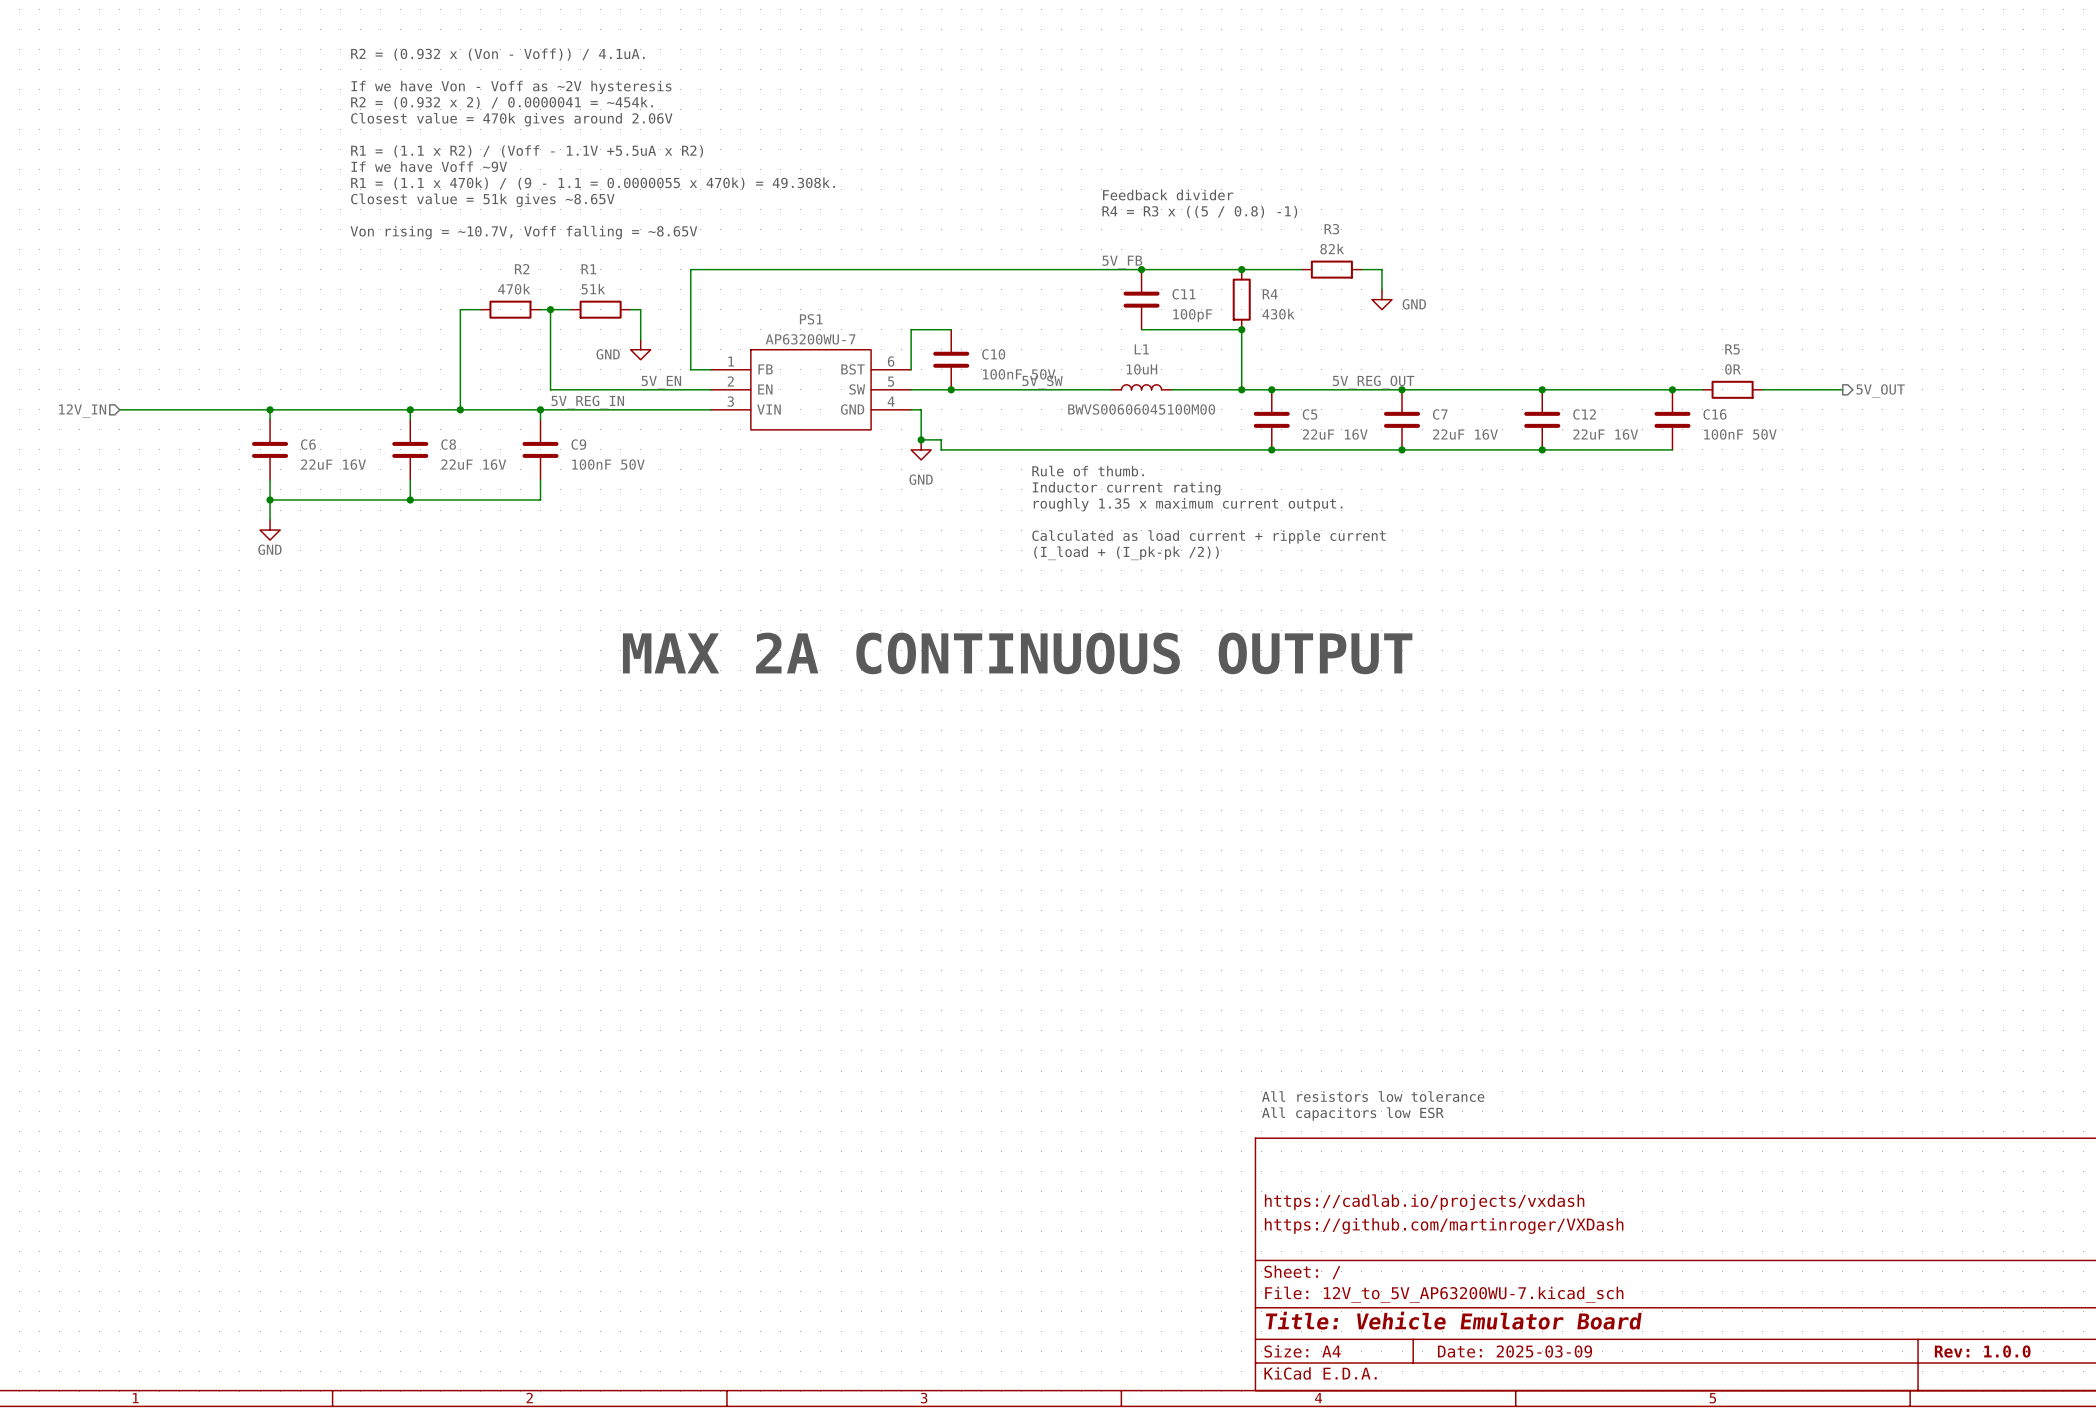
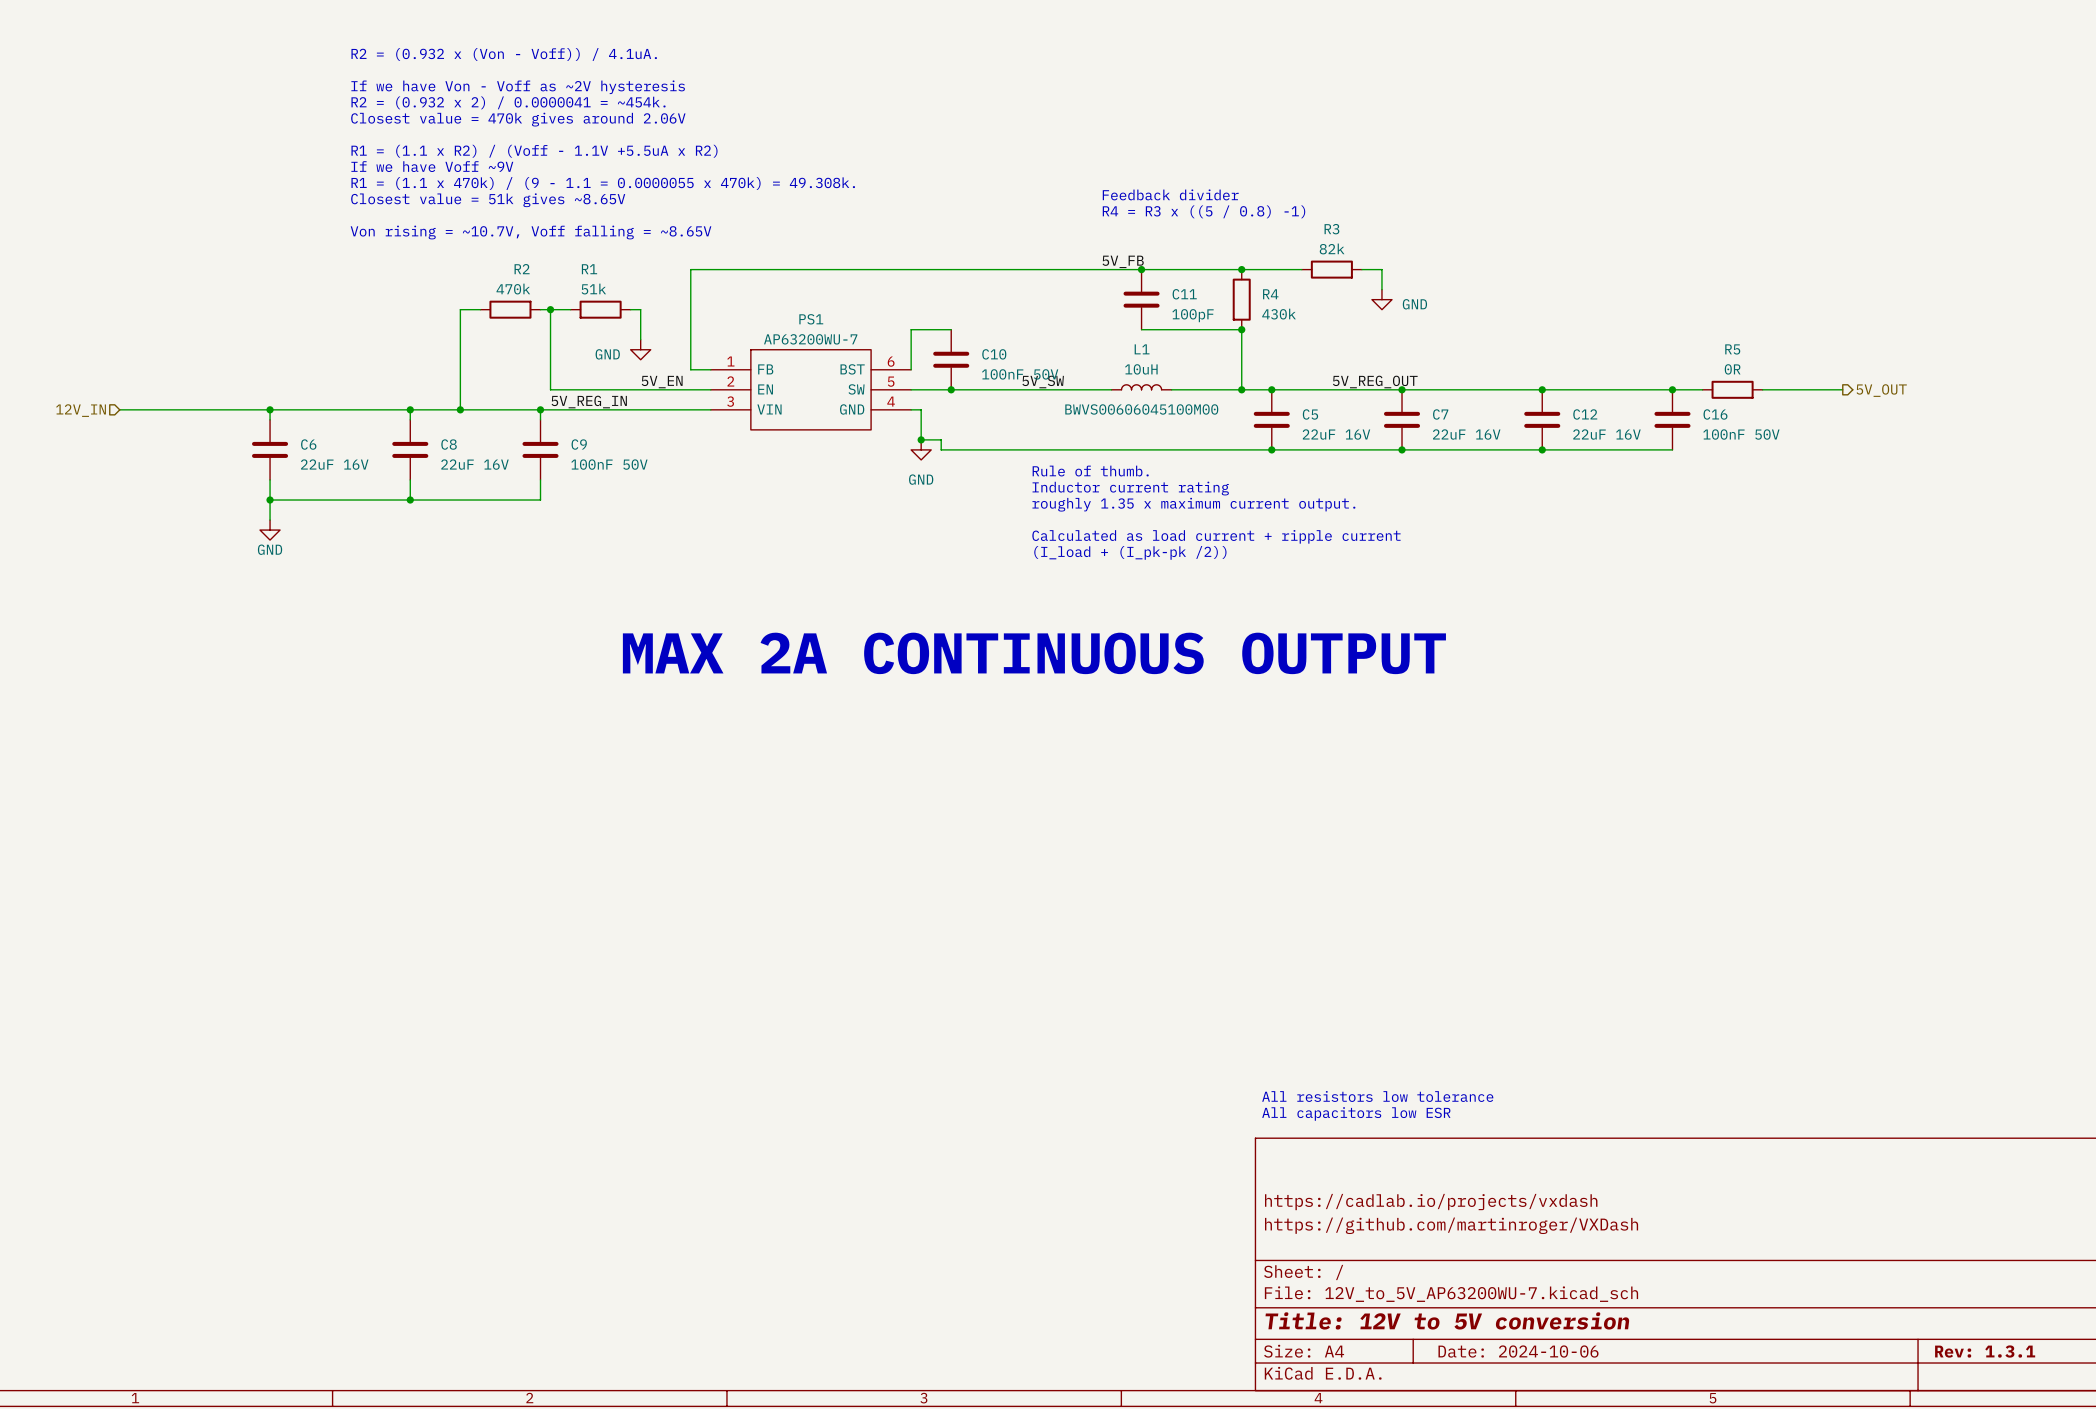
title block: Title: Vehicle Emulator Board (1453, 1320) -> Title: 12V to 5V conversion (1447, 1320)
title block: Date: 2025-03-09 (1515, 1351) -> Date: 2024-10-06 (1518, 1351)
title block: Rev: 1.0.0 (1982, 1351) -> Rev: 1.3.1 (1985, 1351)

